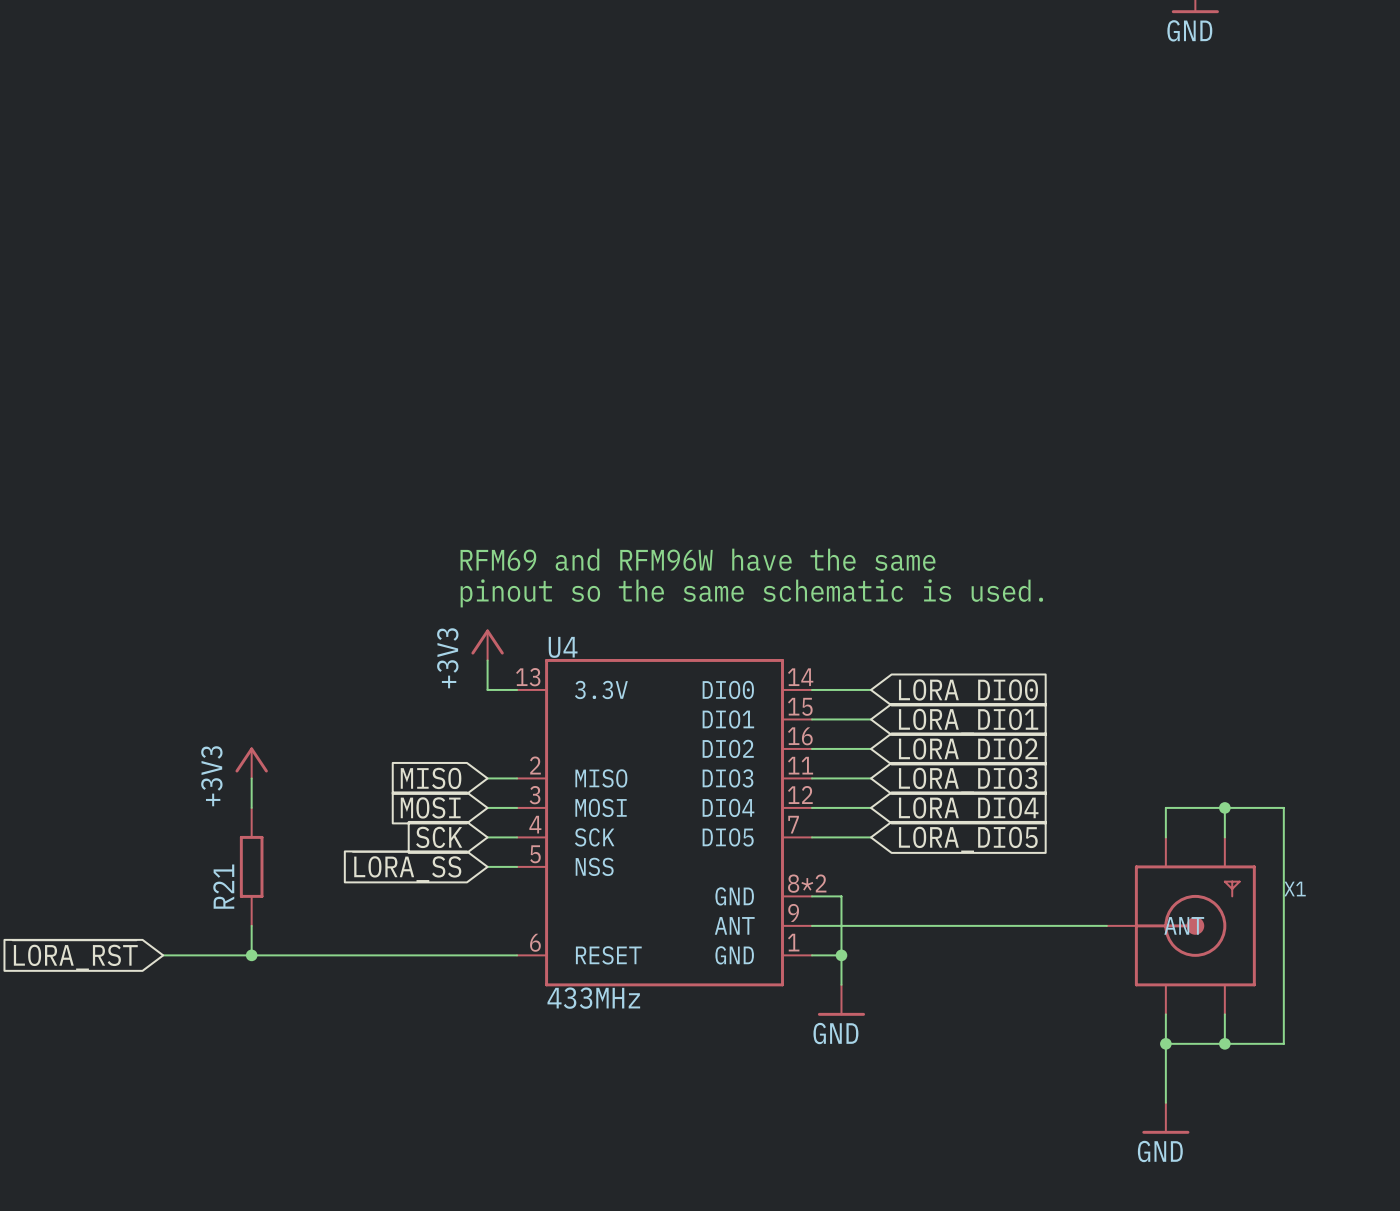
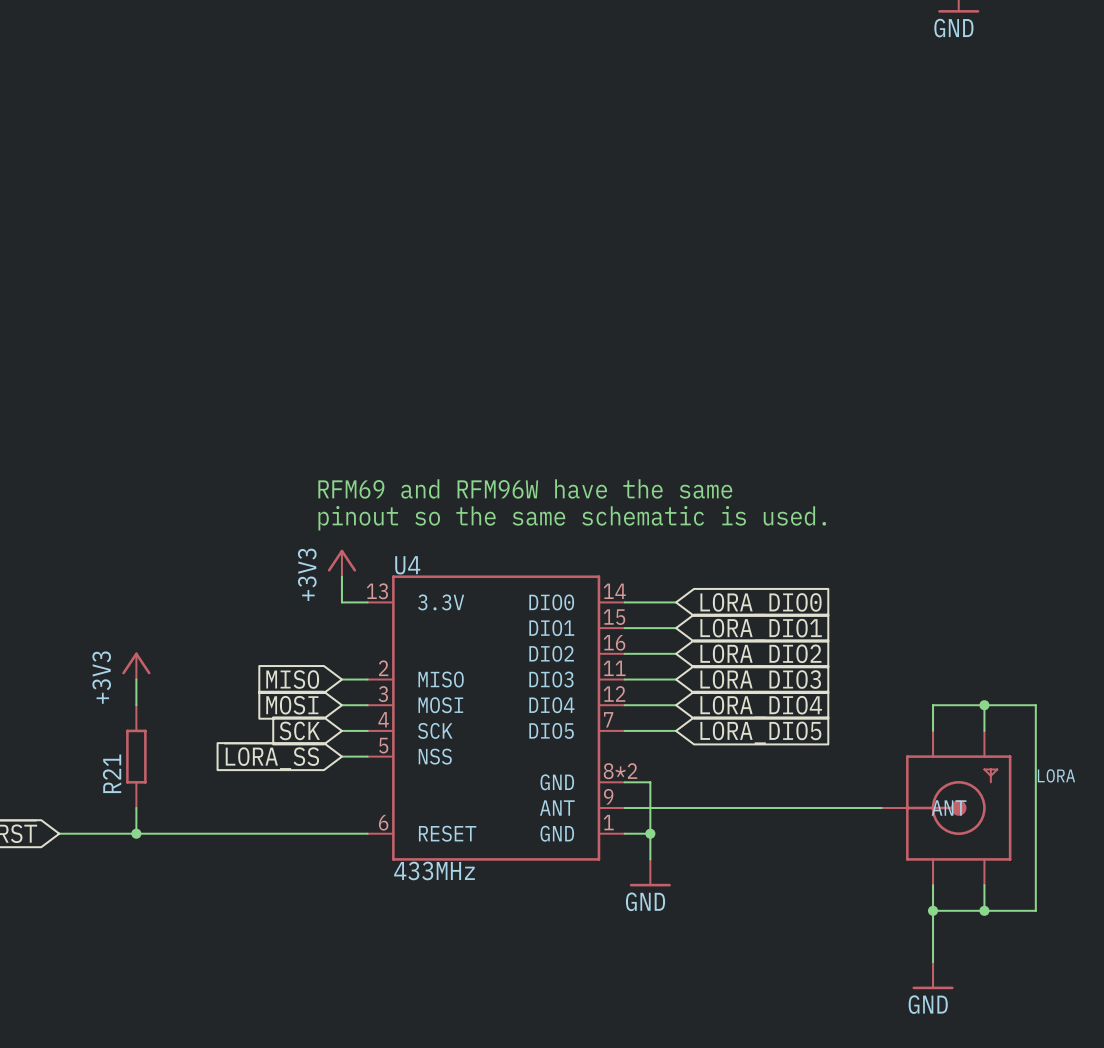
X1 name: X1 (1295, 889) -> LORA (1056, 775)

